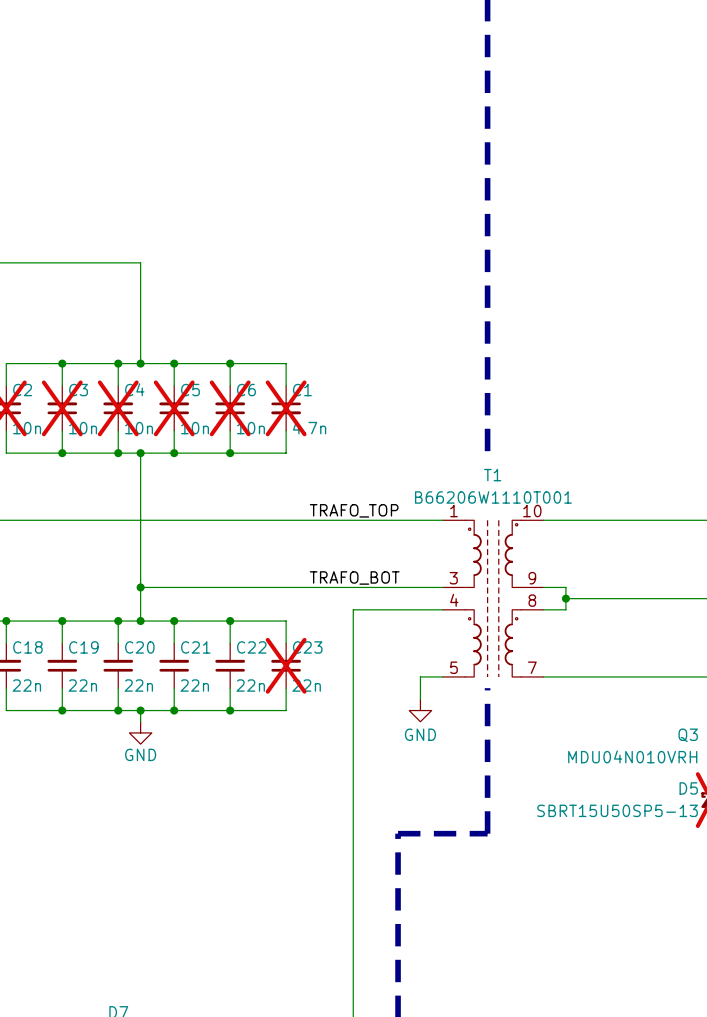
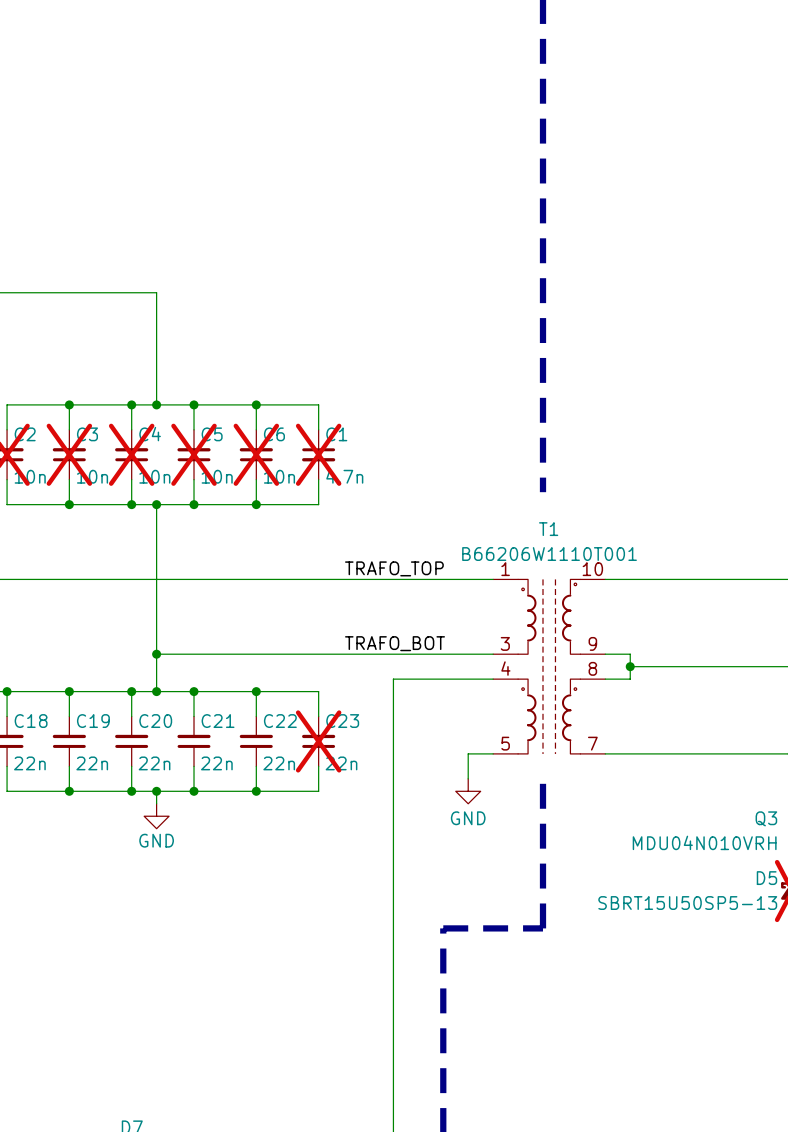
line: (487, 441) (487, 453) -> none
line: (487, 688) (487, 699) -> none

